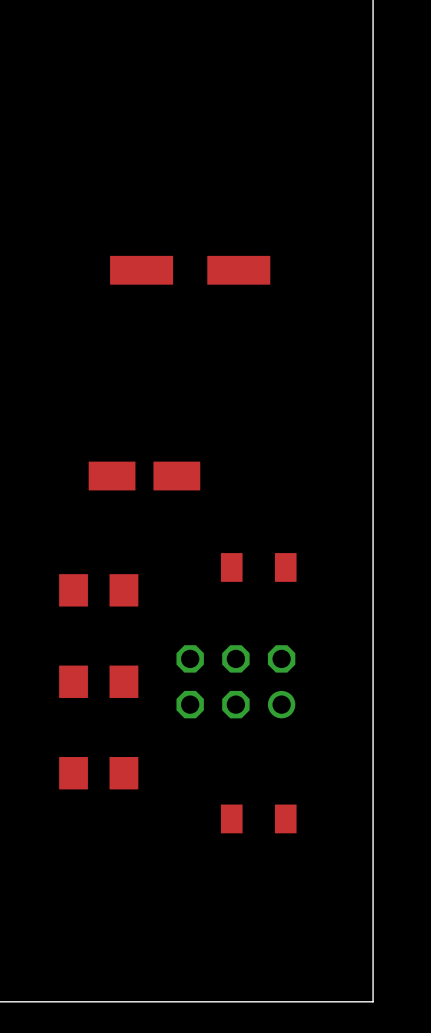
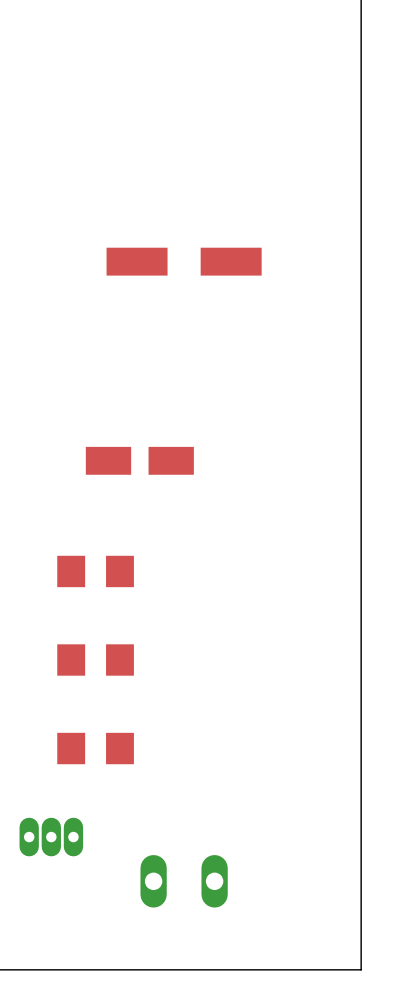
part: (258, 567) -> none
part: (235, 681) -> none
part: (258, 818) -> none
part: none -> (51, 837)
part: none -> (184, 881)

